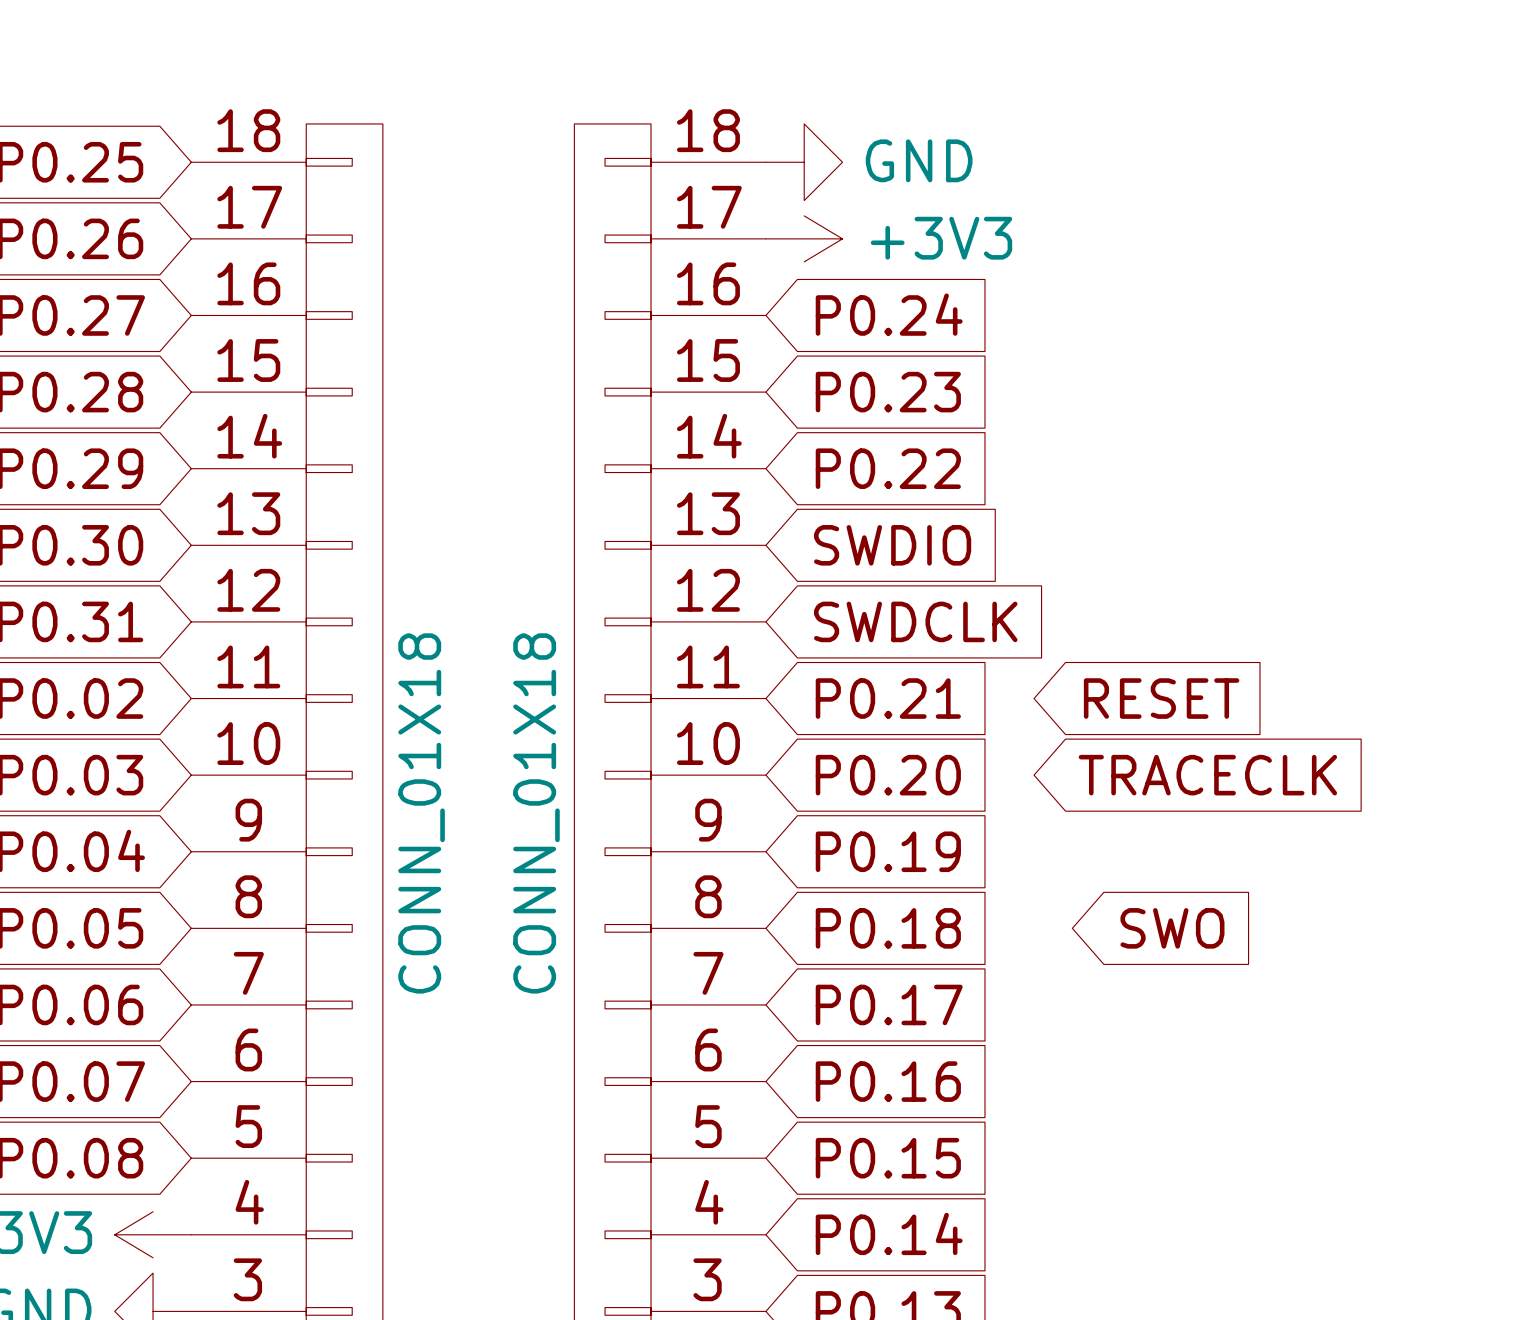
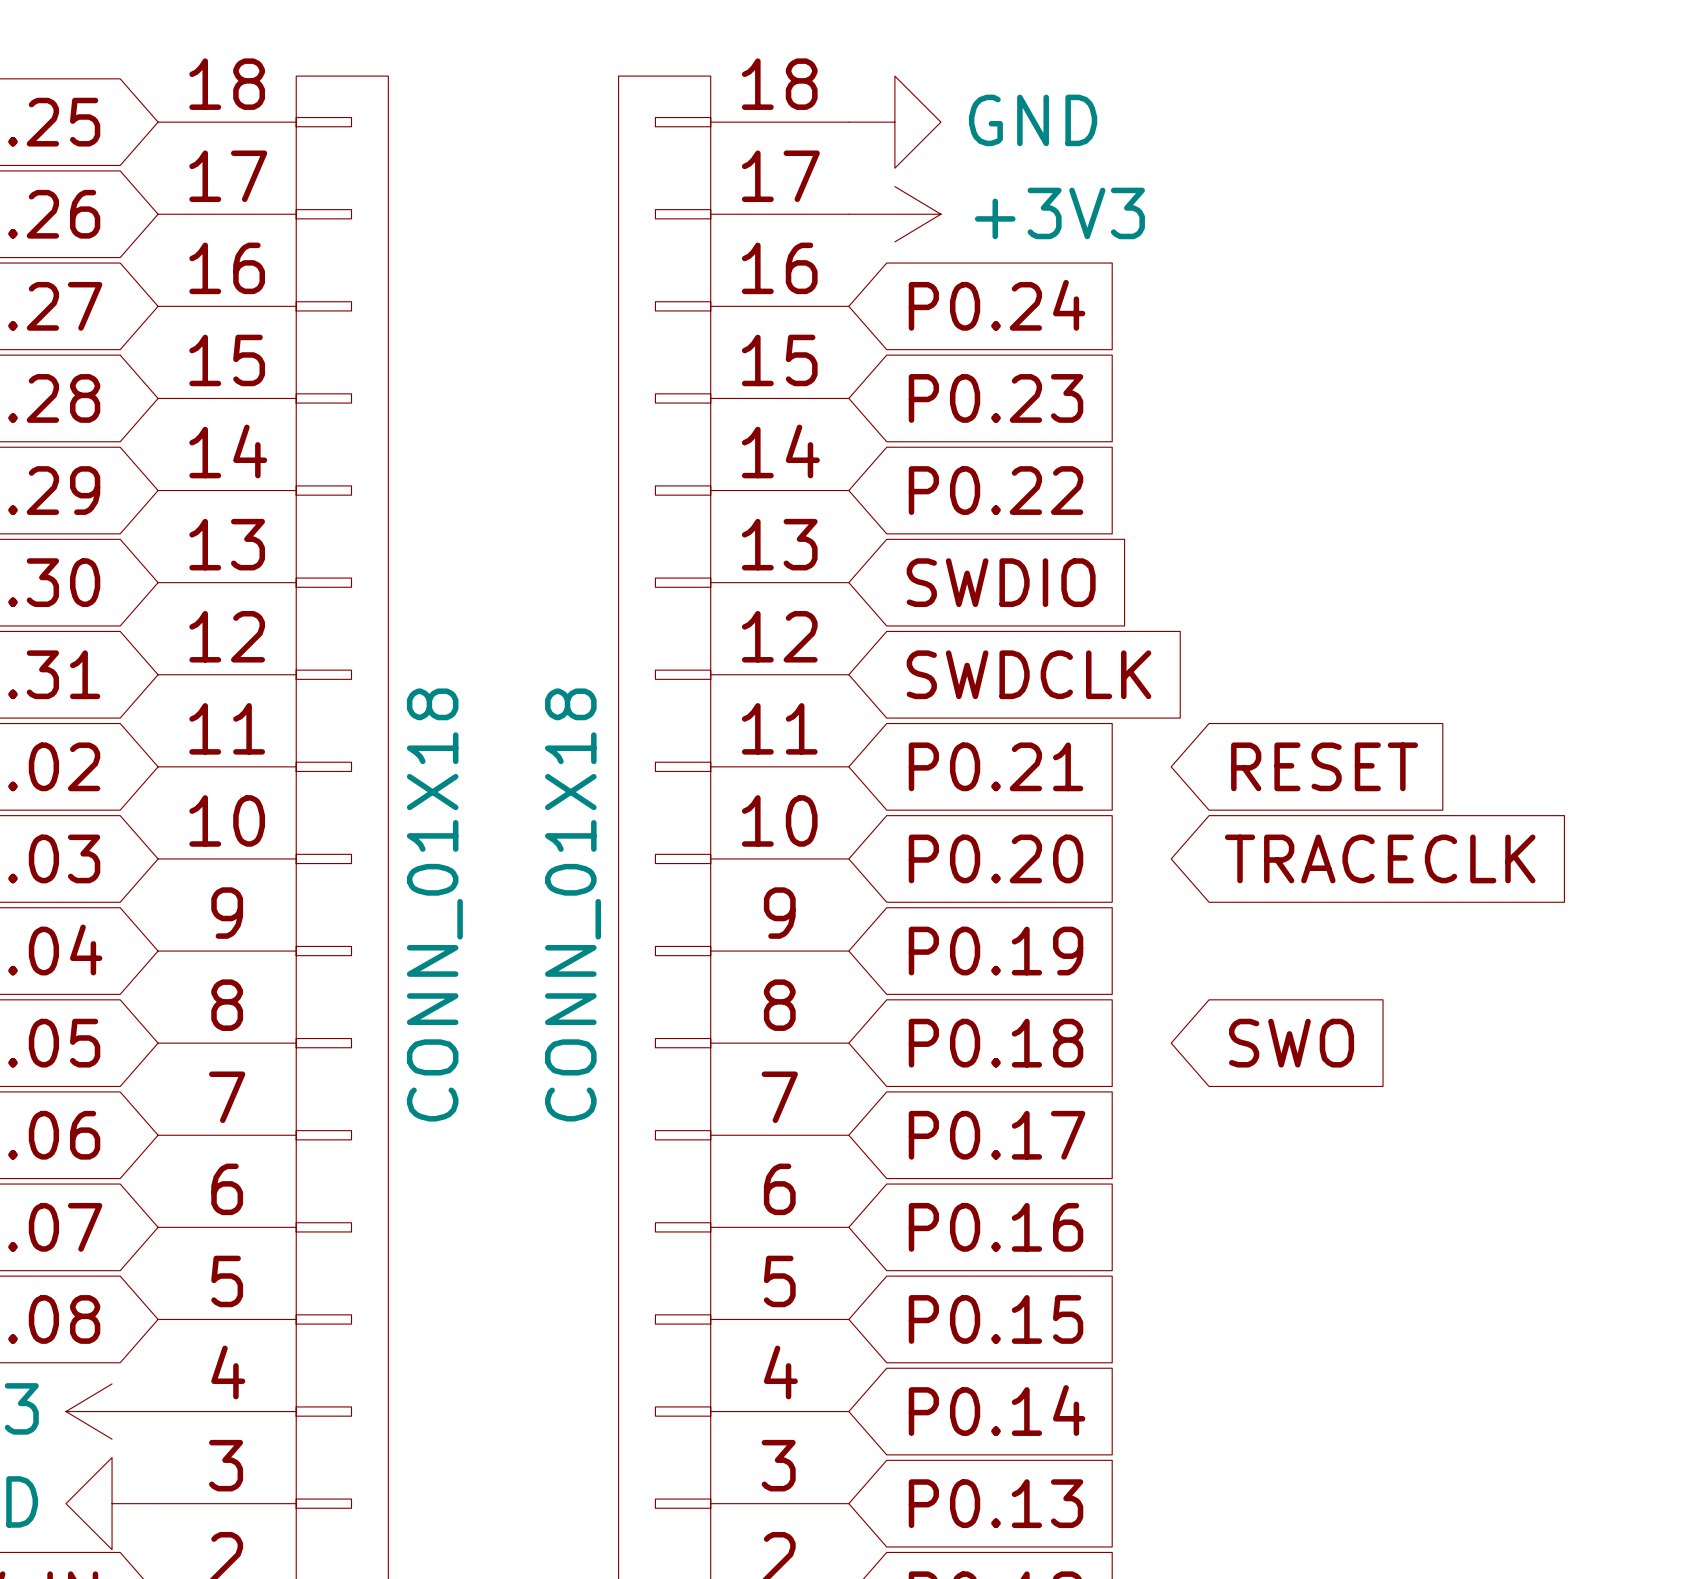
global label position: SWO (1172, 928) -> SWO (1291, 1043)

